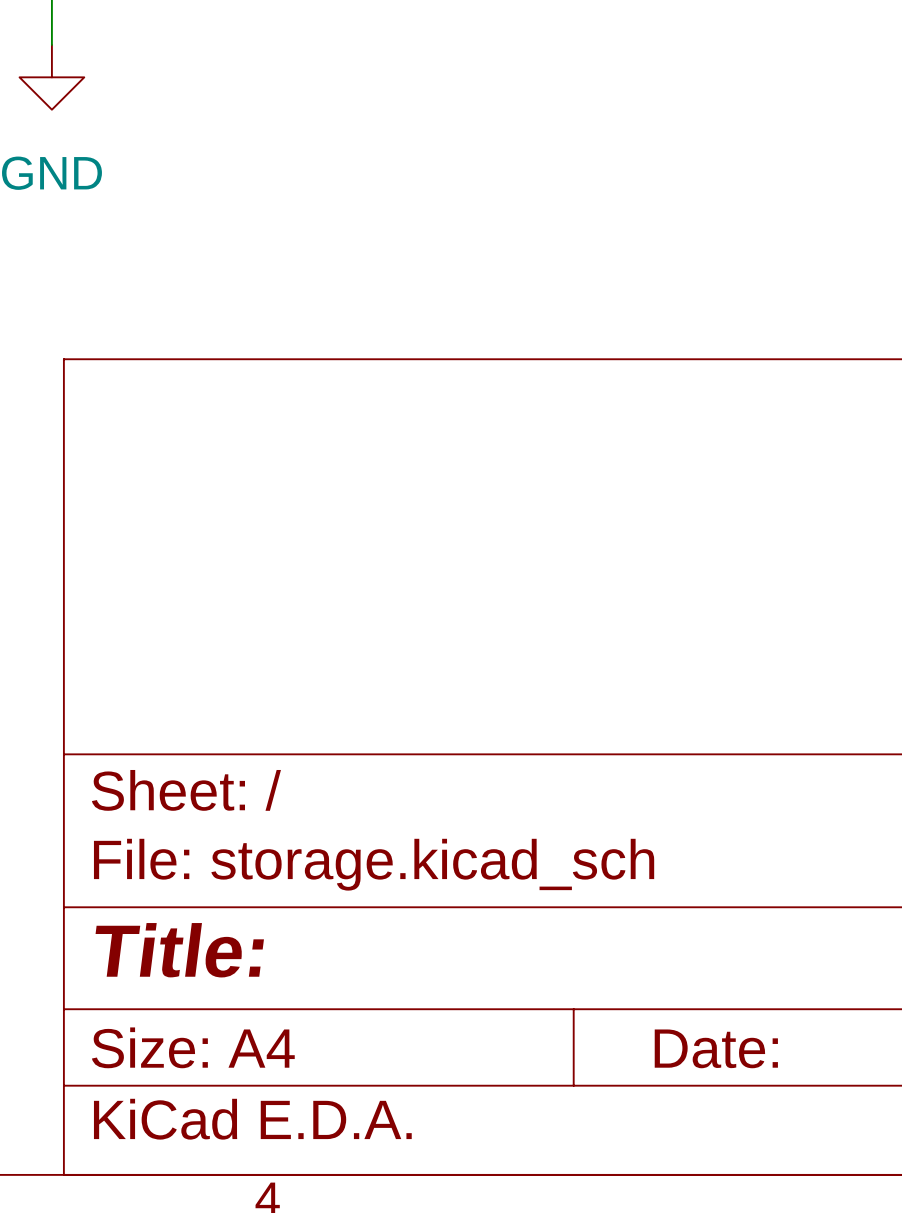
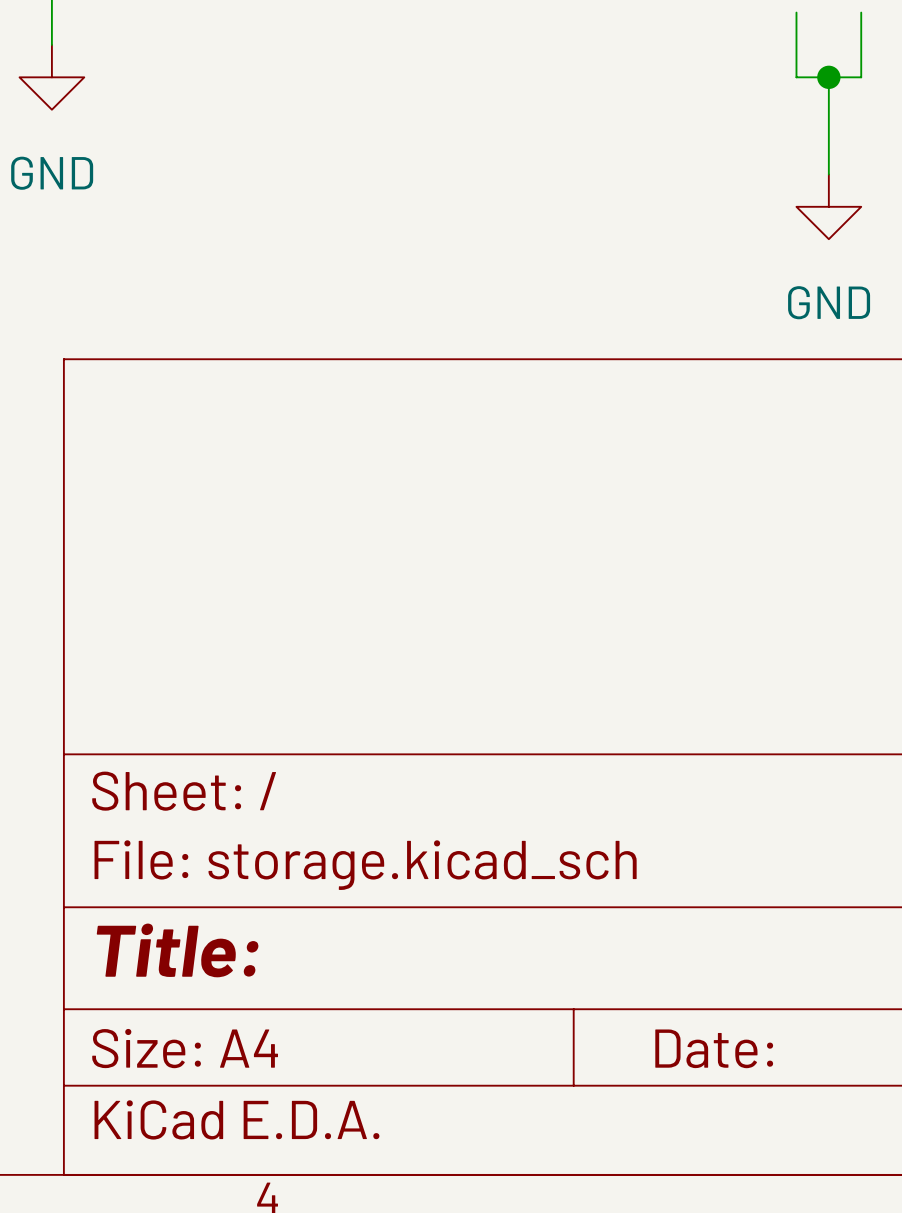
wire: none -> (796, 12) (796, 77) (861, 77) (861, 12)
wire: none -> (828, 77) (828, 174)
junction: none -> (828, 77)
power symbol: none -> GND (828, 206)

